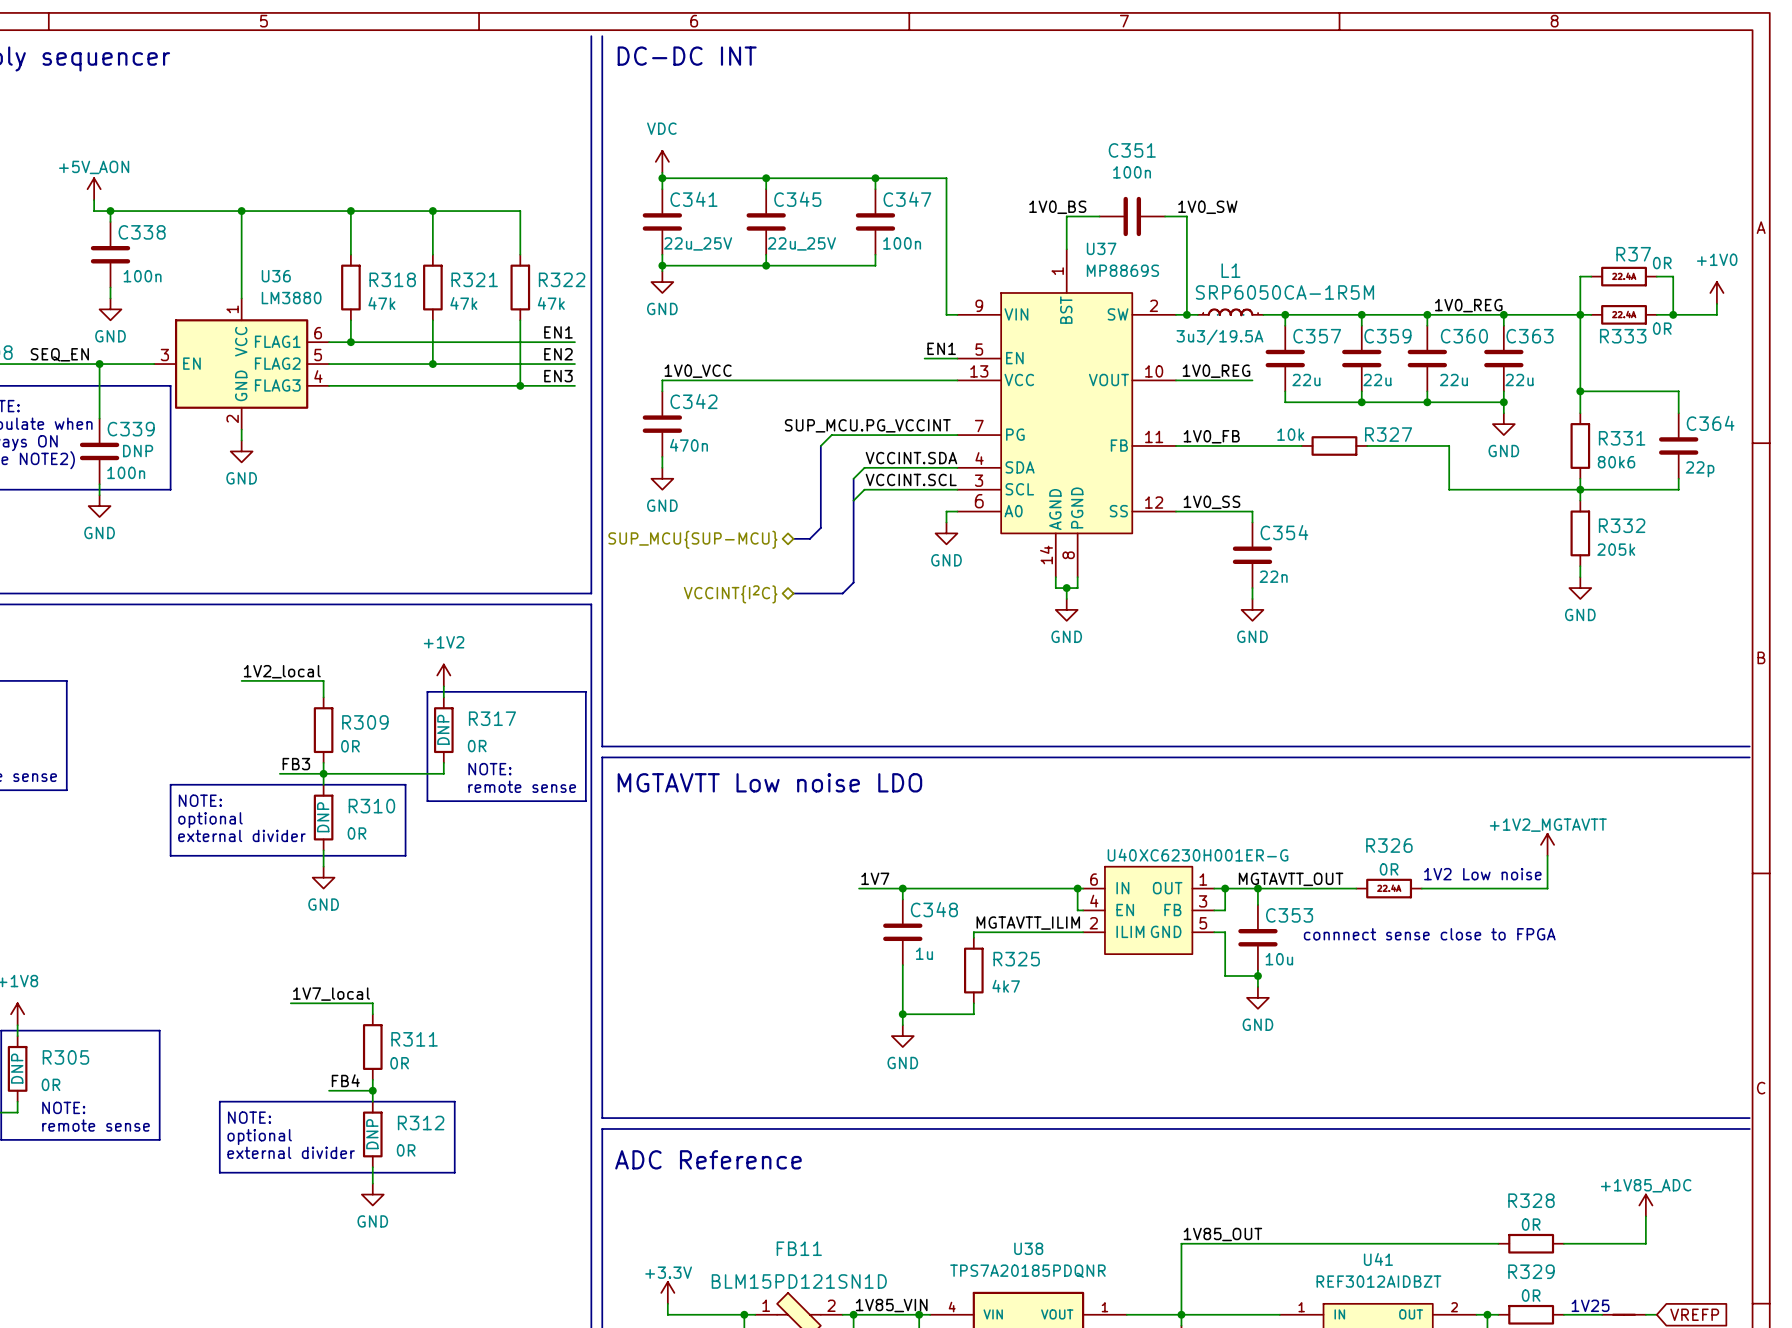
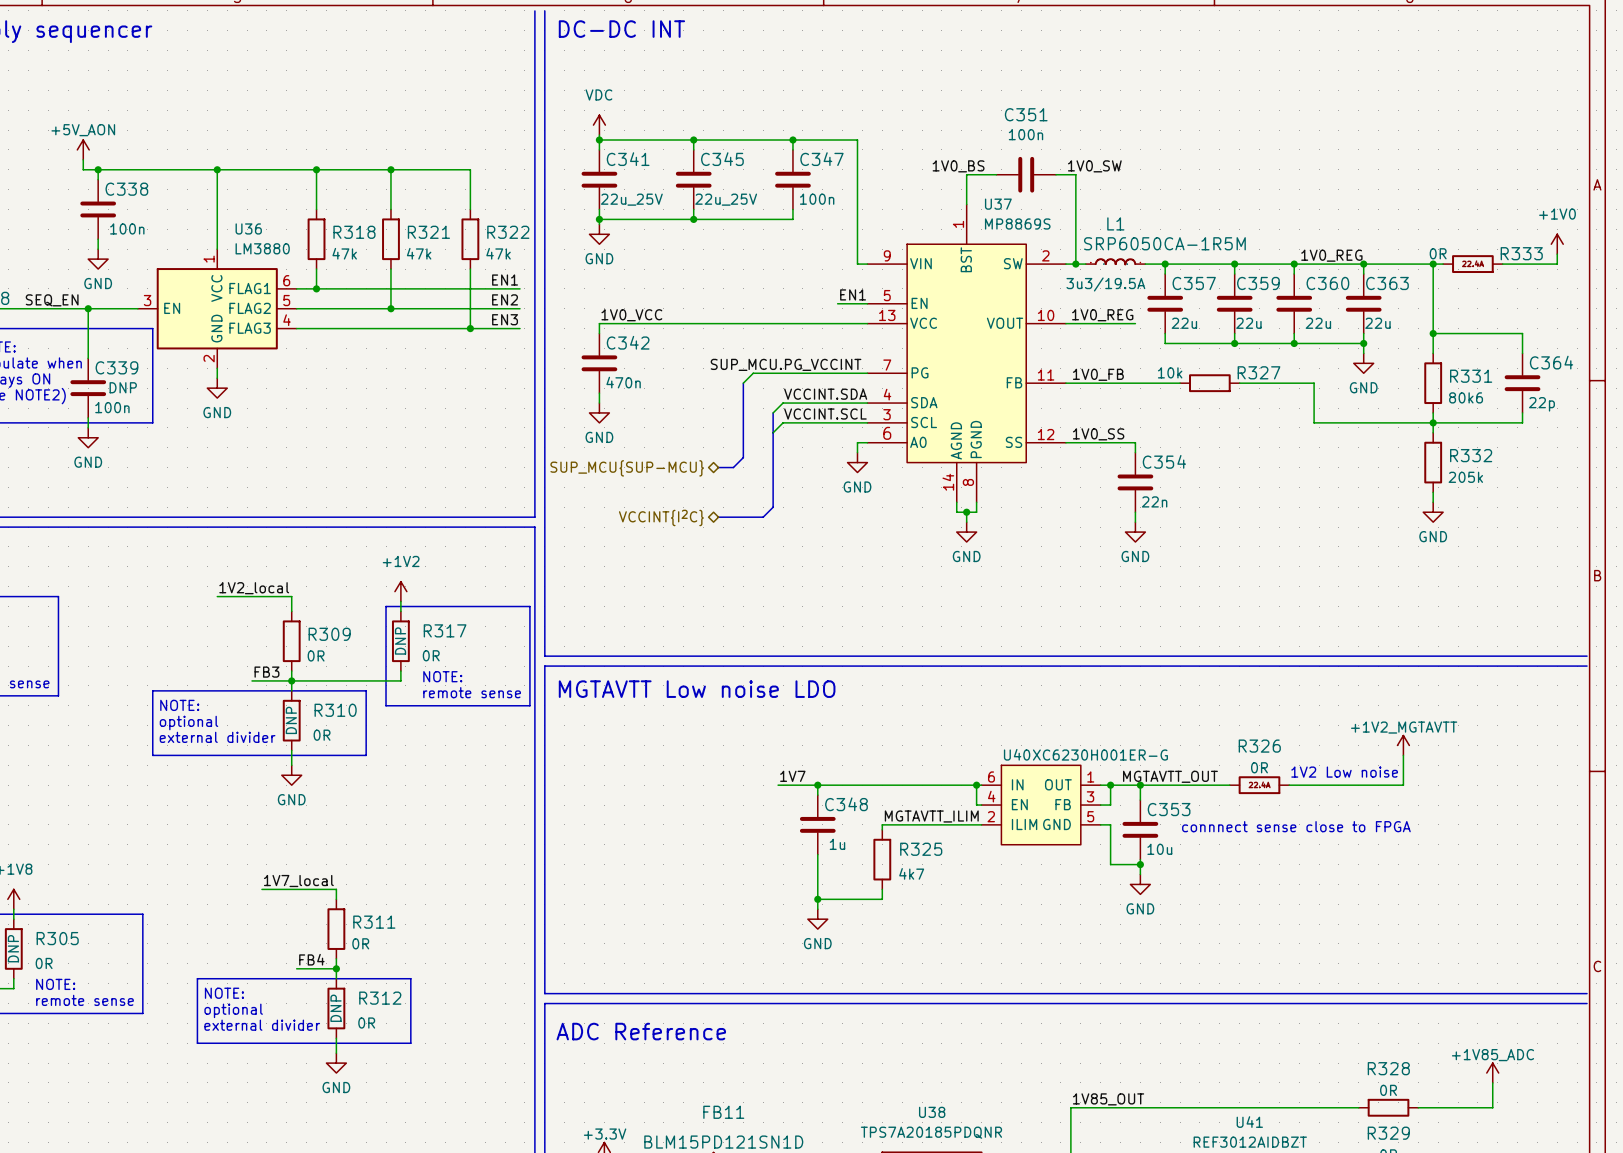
wire: (1591, 276) (1580, 276) (1580, 314) -> none
R37: (1624, 276) -> none
wire: (1656, 276) (1673, 276) (1673, 314) -> none
junction: (1673, 314) -> none
R333 text position: 0R (1662, 328) -> 0R (1438, 253)
R333 name position: R333 (1623, 336) -> R333 (1521, 253)

